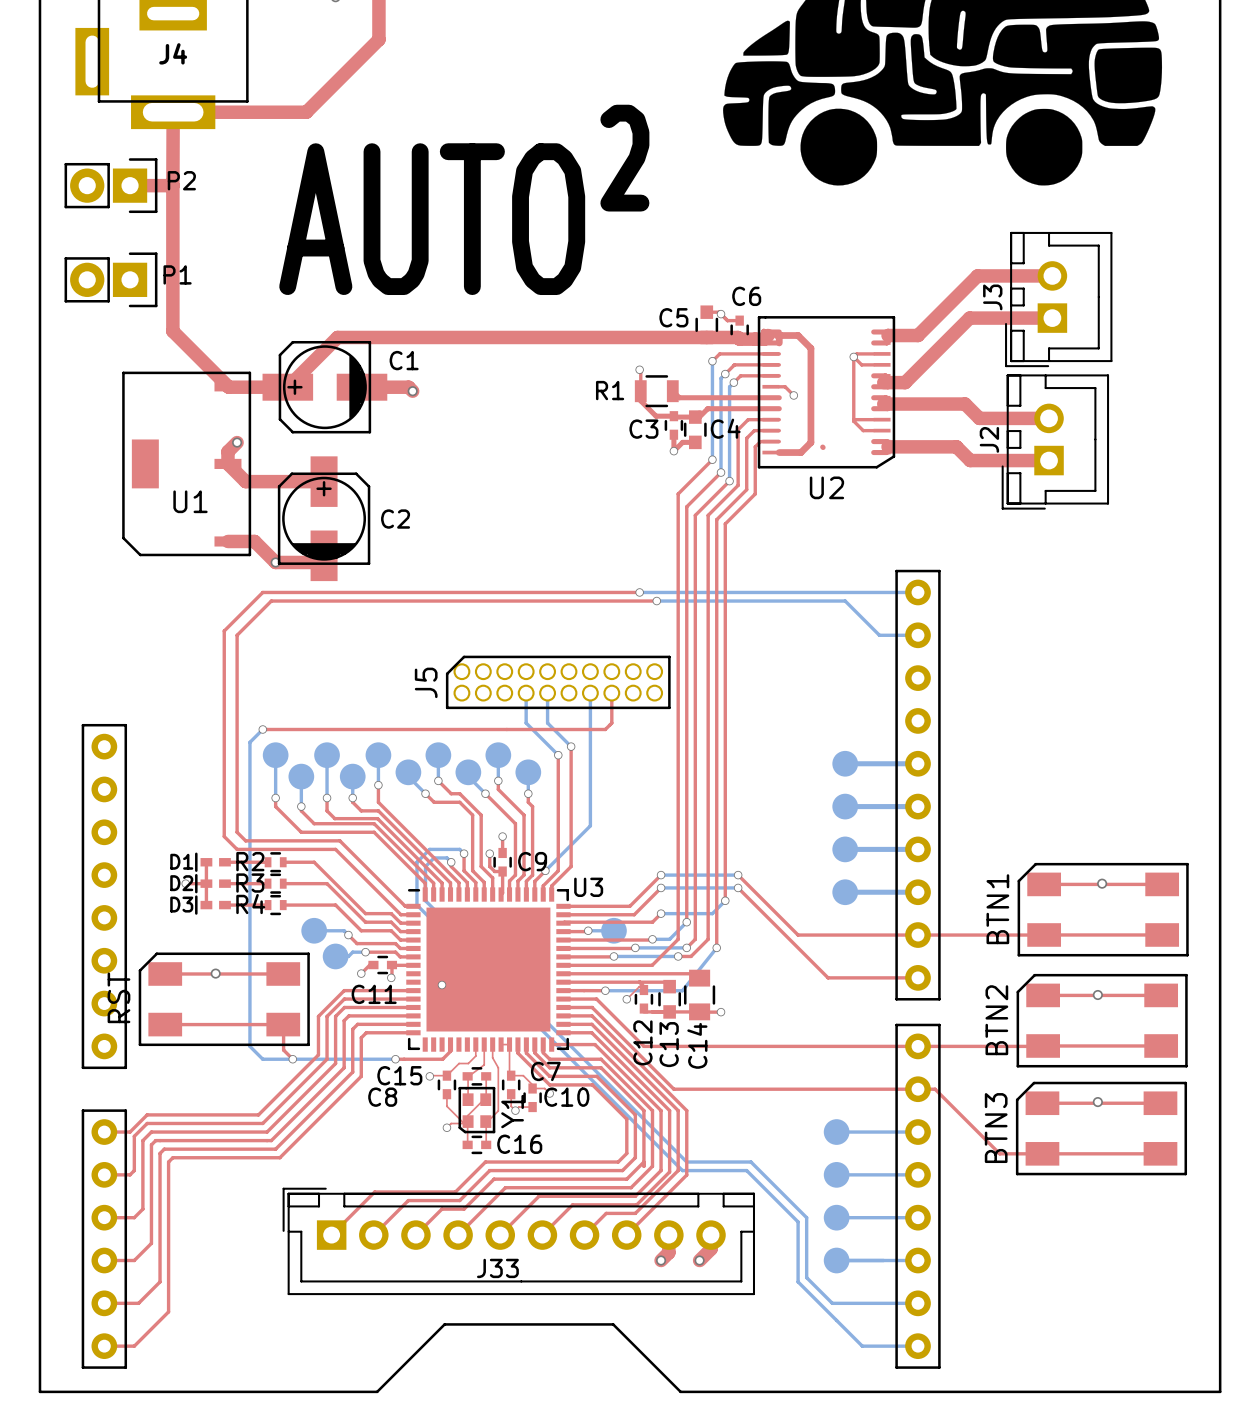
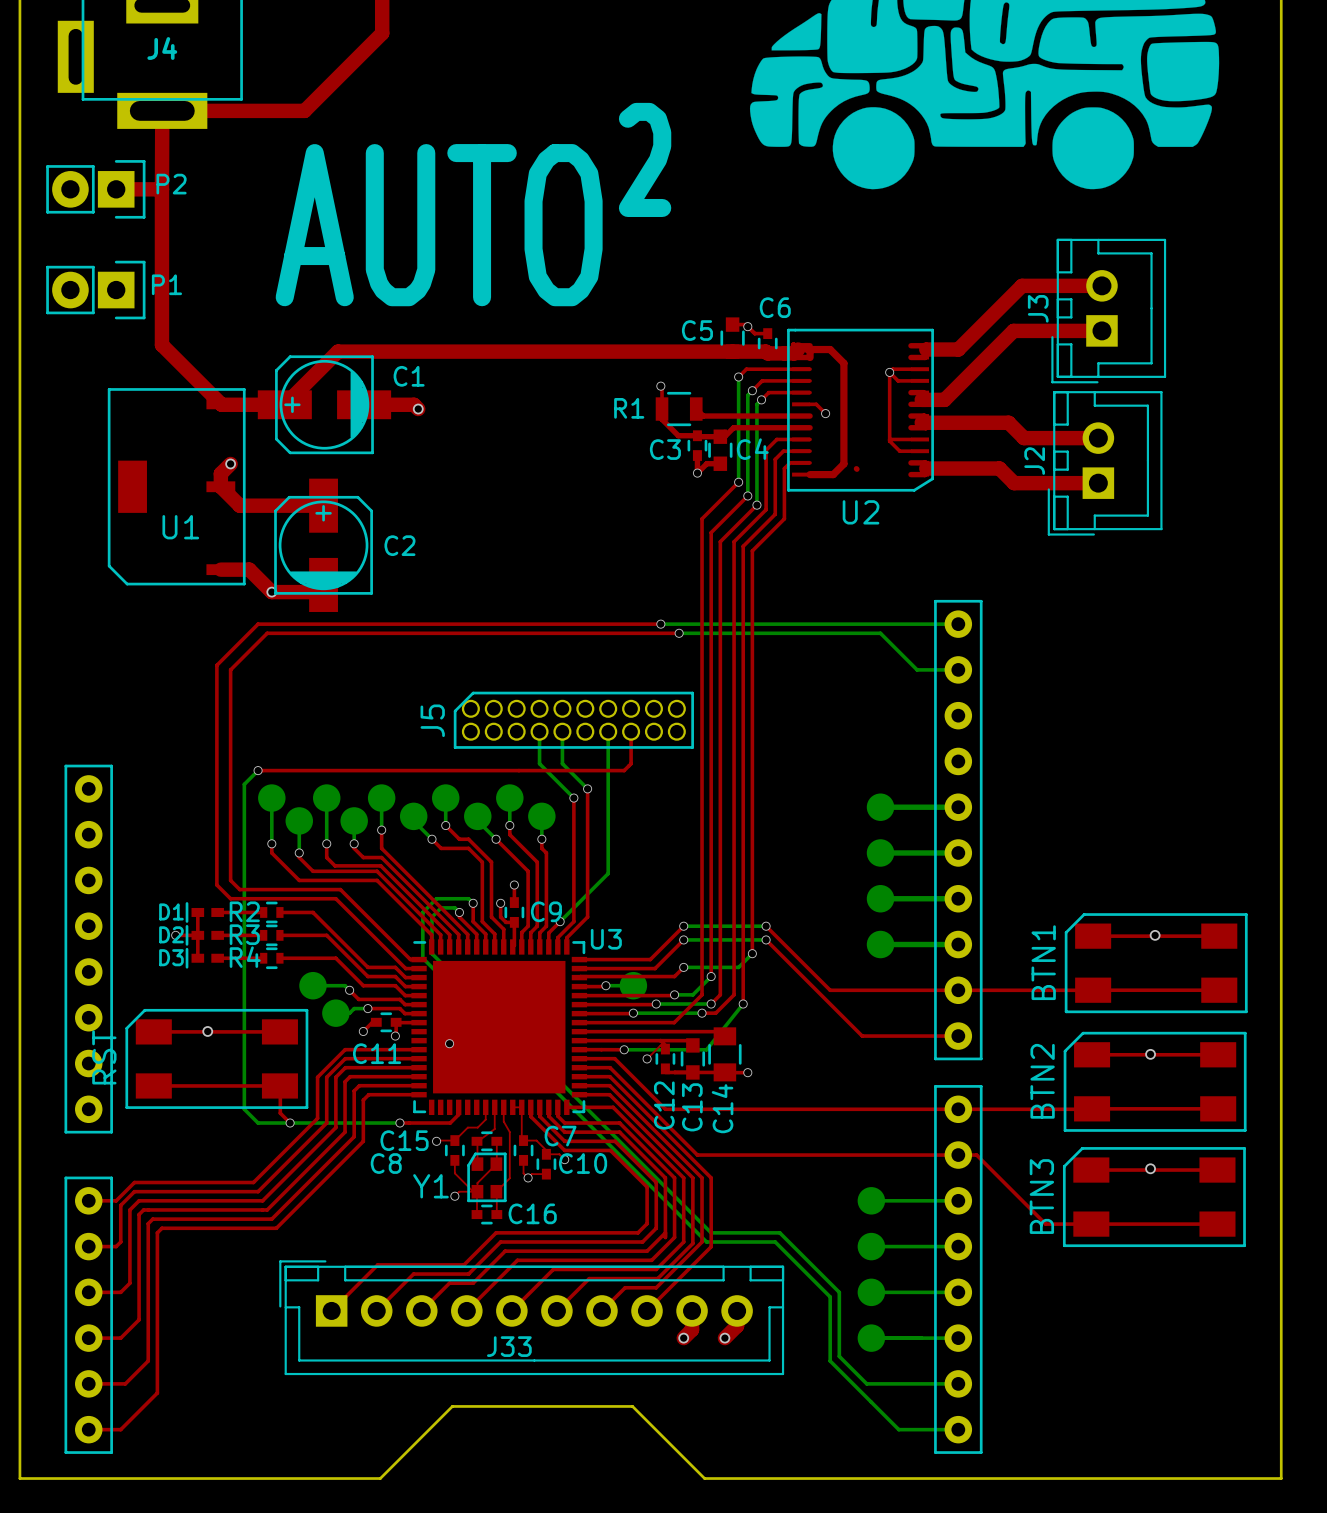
Y1 footprint: [458, 1086, 496, 1134] -> [467, 1152, 507, 1203]
Y1 name rotation: 0° (512, 1111) -> 90° clockwise (430, 1186)
Y1 name position: Y1 (512, 1111) -> Y1 (430, 1186)

